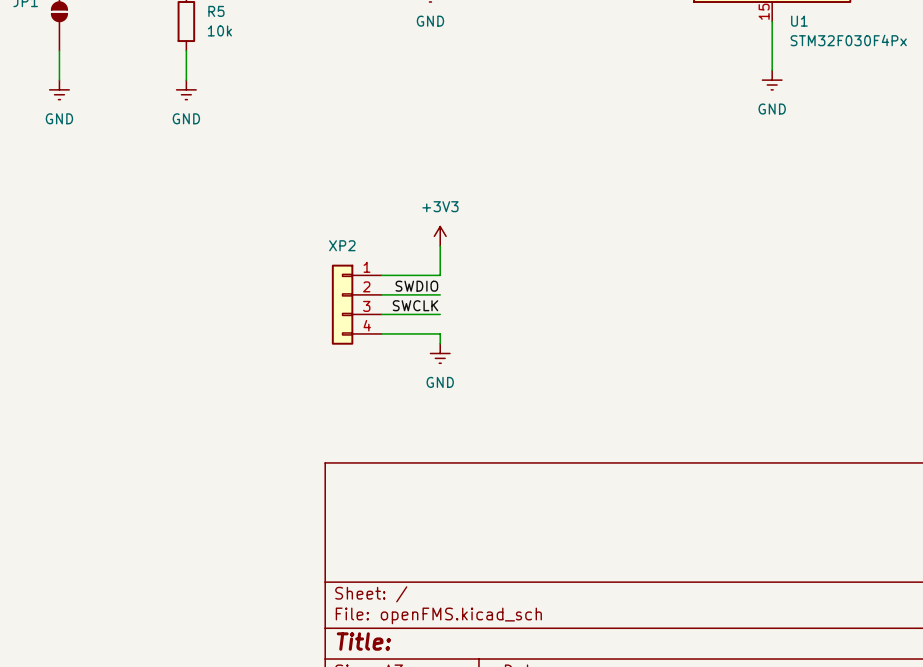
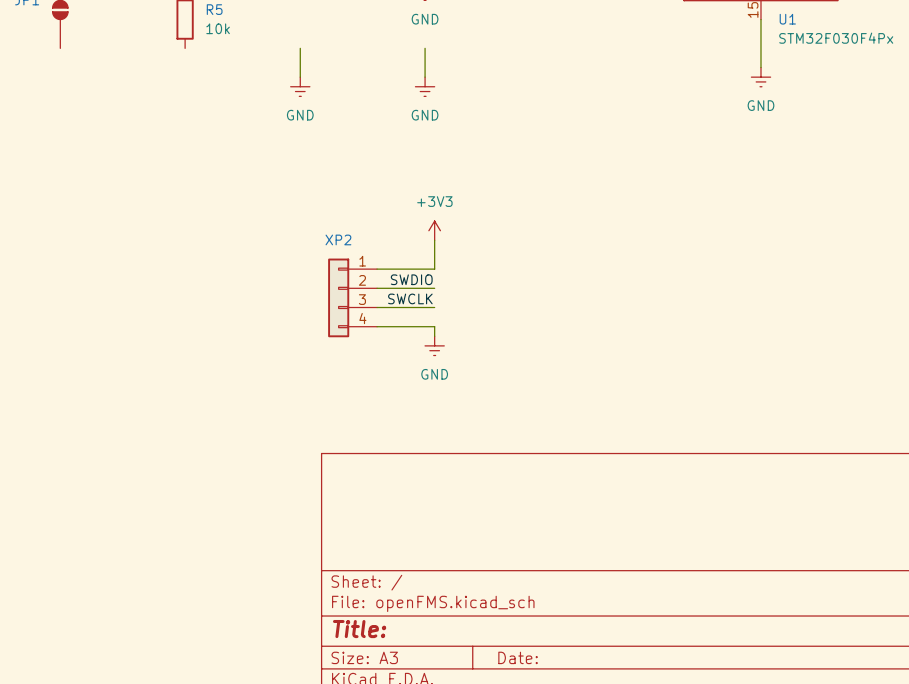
wire: (59, 50) (59, 80) -> none
wire: (186, 50) (186, 80) -> (300, 48) (300, 77)
wire: none -> (425, 48) (425, 77)
power symbol: GND (59, 89) -> none
power symbol position: GND (186, 89) -> GND (300, 86)
power symbol: none -> GND (425, 86)

